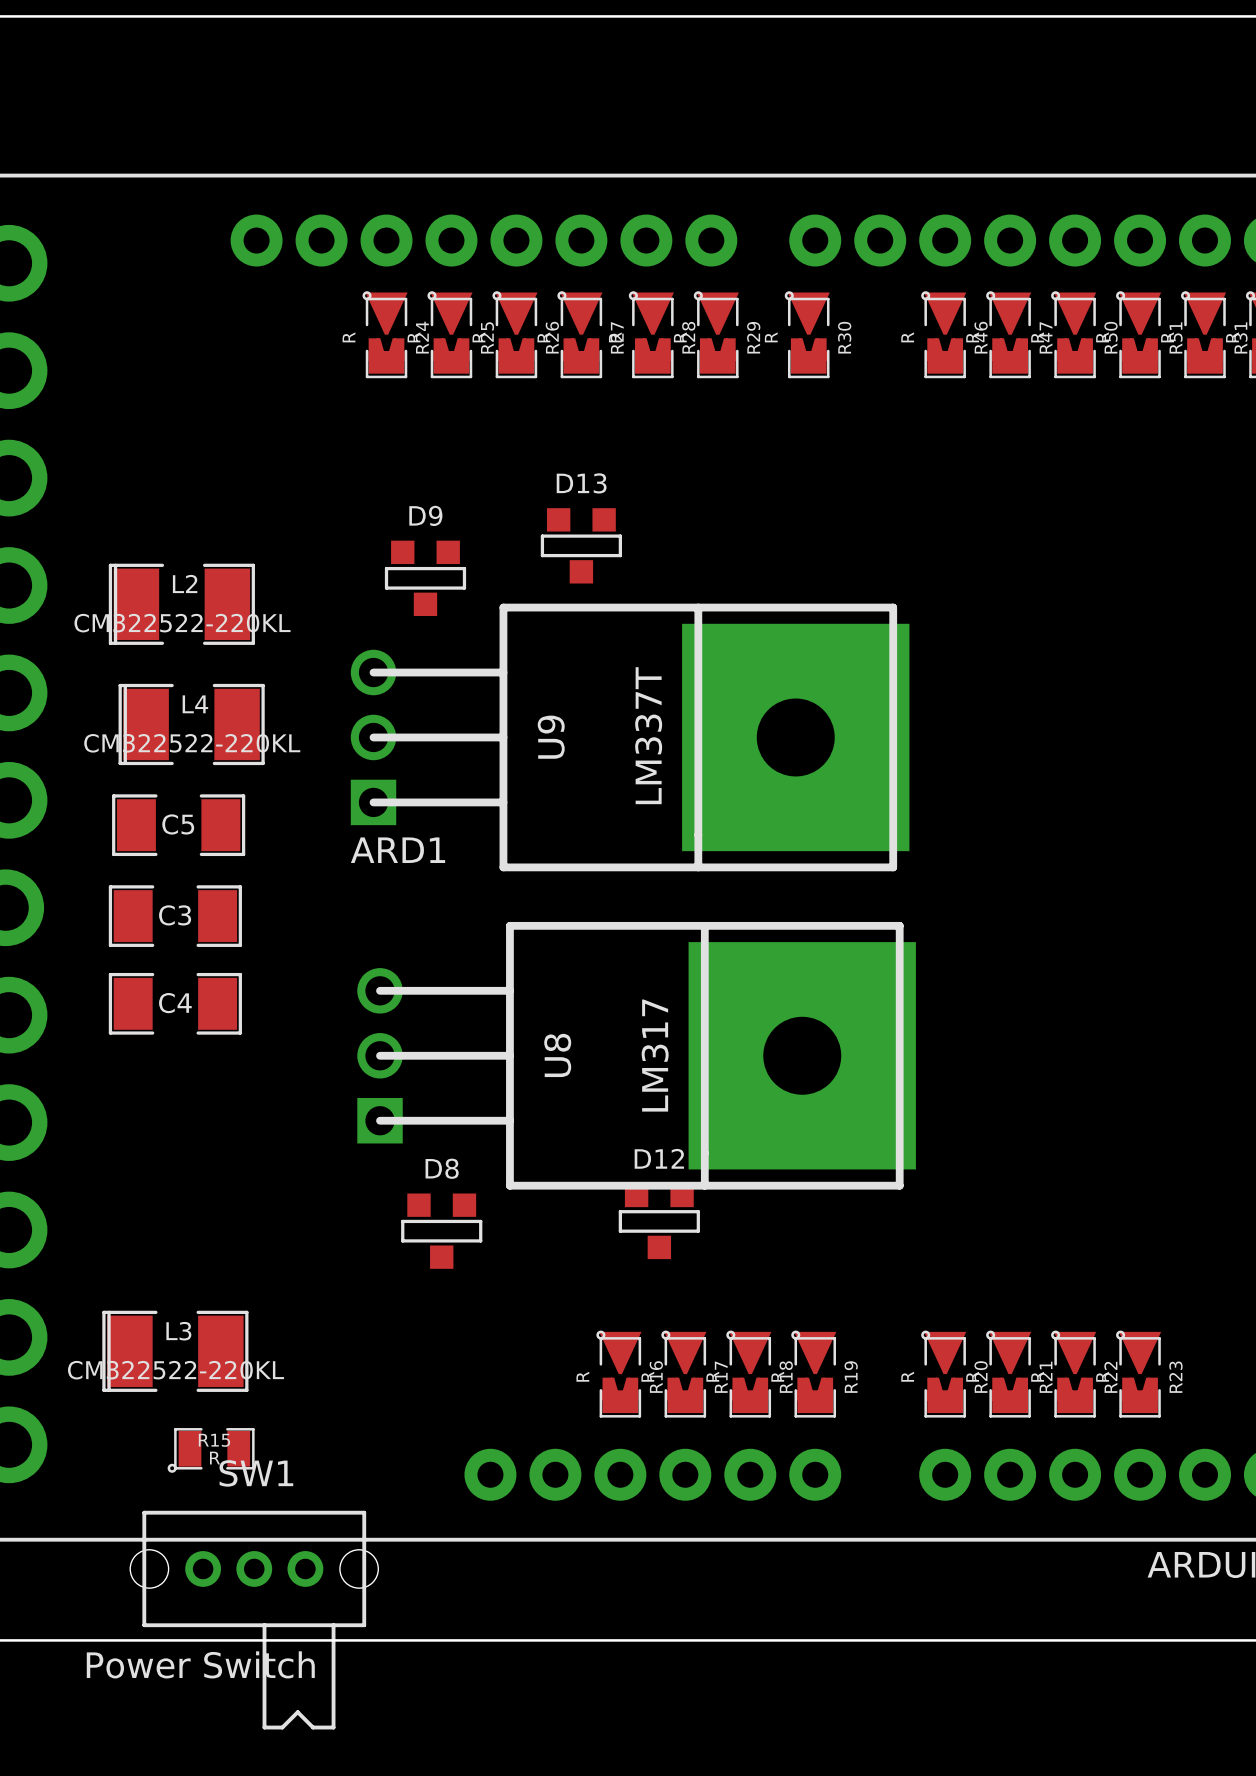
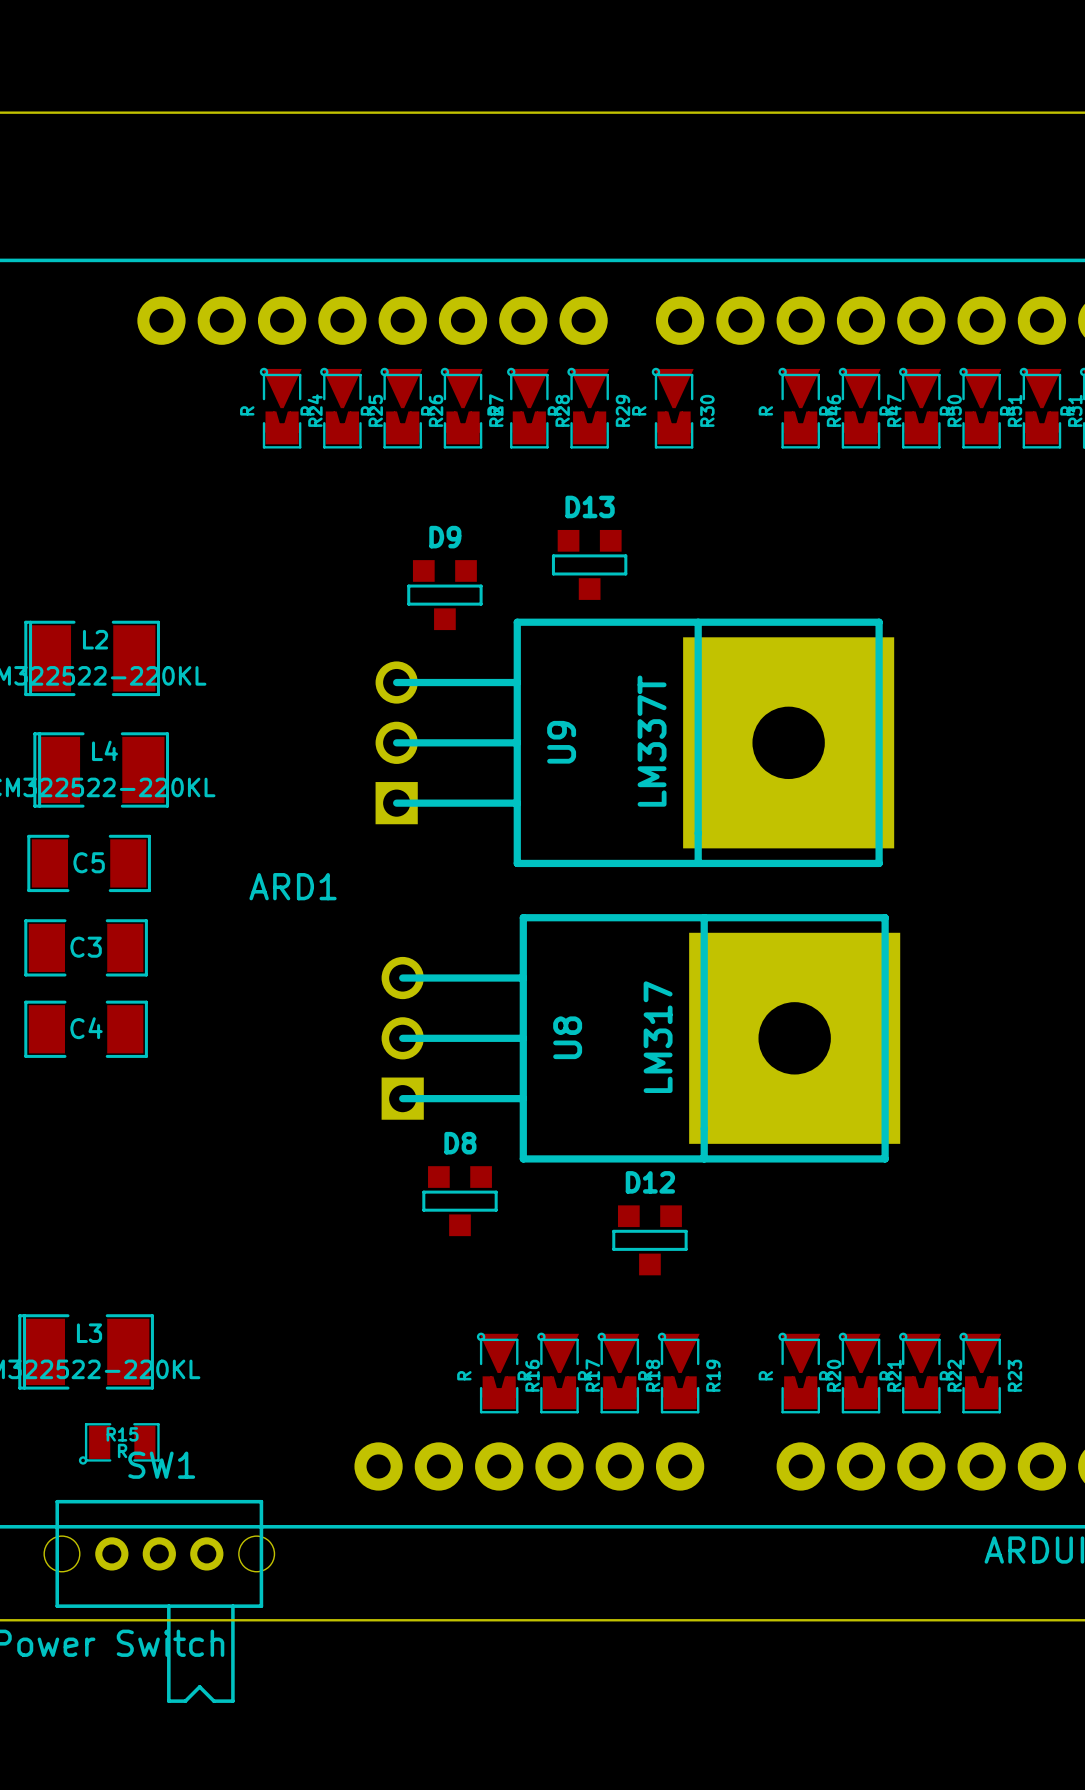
D13 position: (581, 545) -> (589, 564)
D9 position: (425, 578) -> (444, 595)
U9 position: (630, 737) -> (634, 742)
U8 position: (636, 1055) -> (640, 1038)
D12 position: (659, 1221) -> (649, 1240)
D8 position: (441, 1231) -> (459, 1201)

